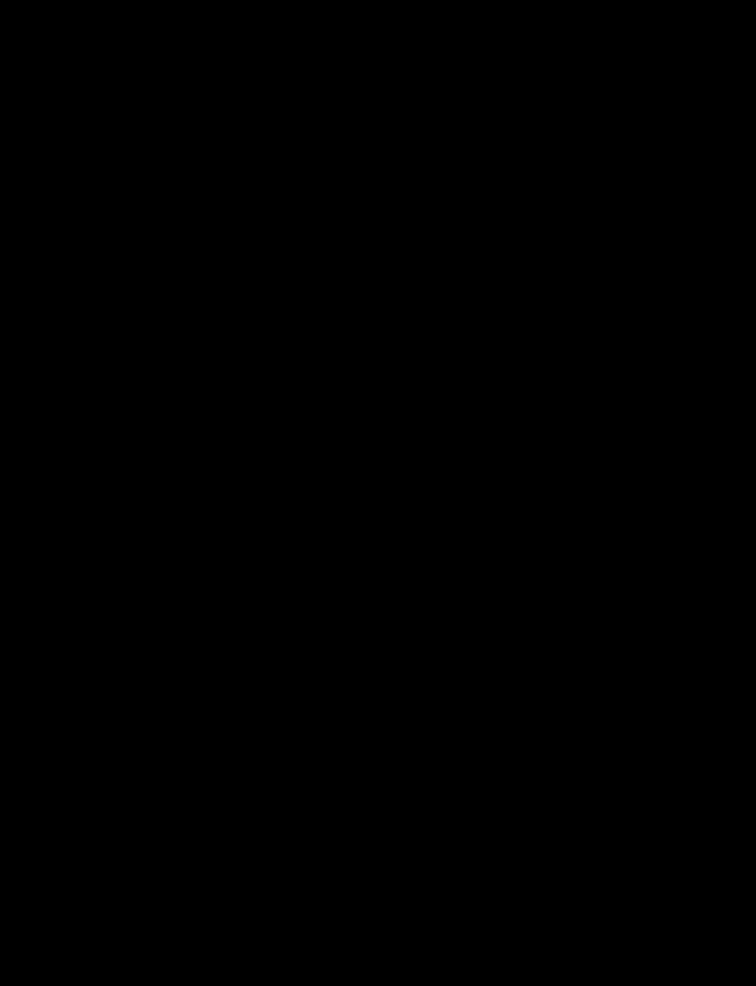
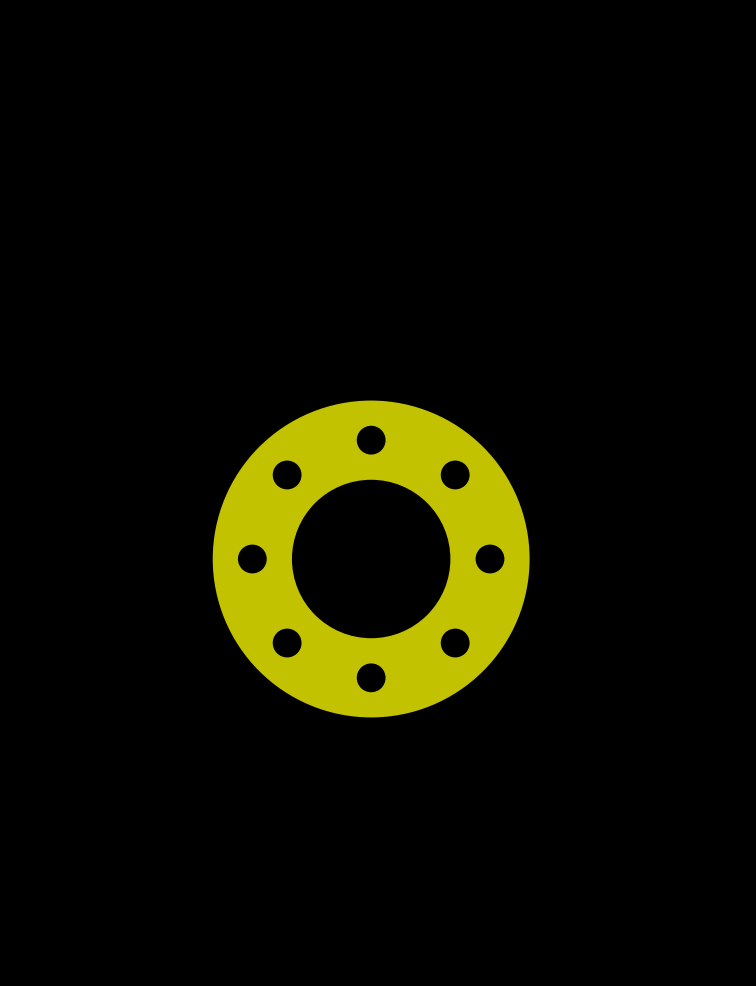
part: none -> (371, 558)

